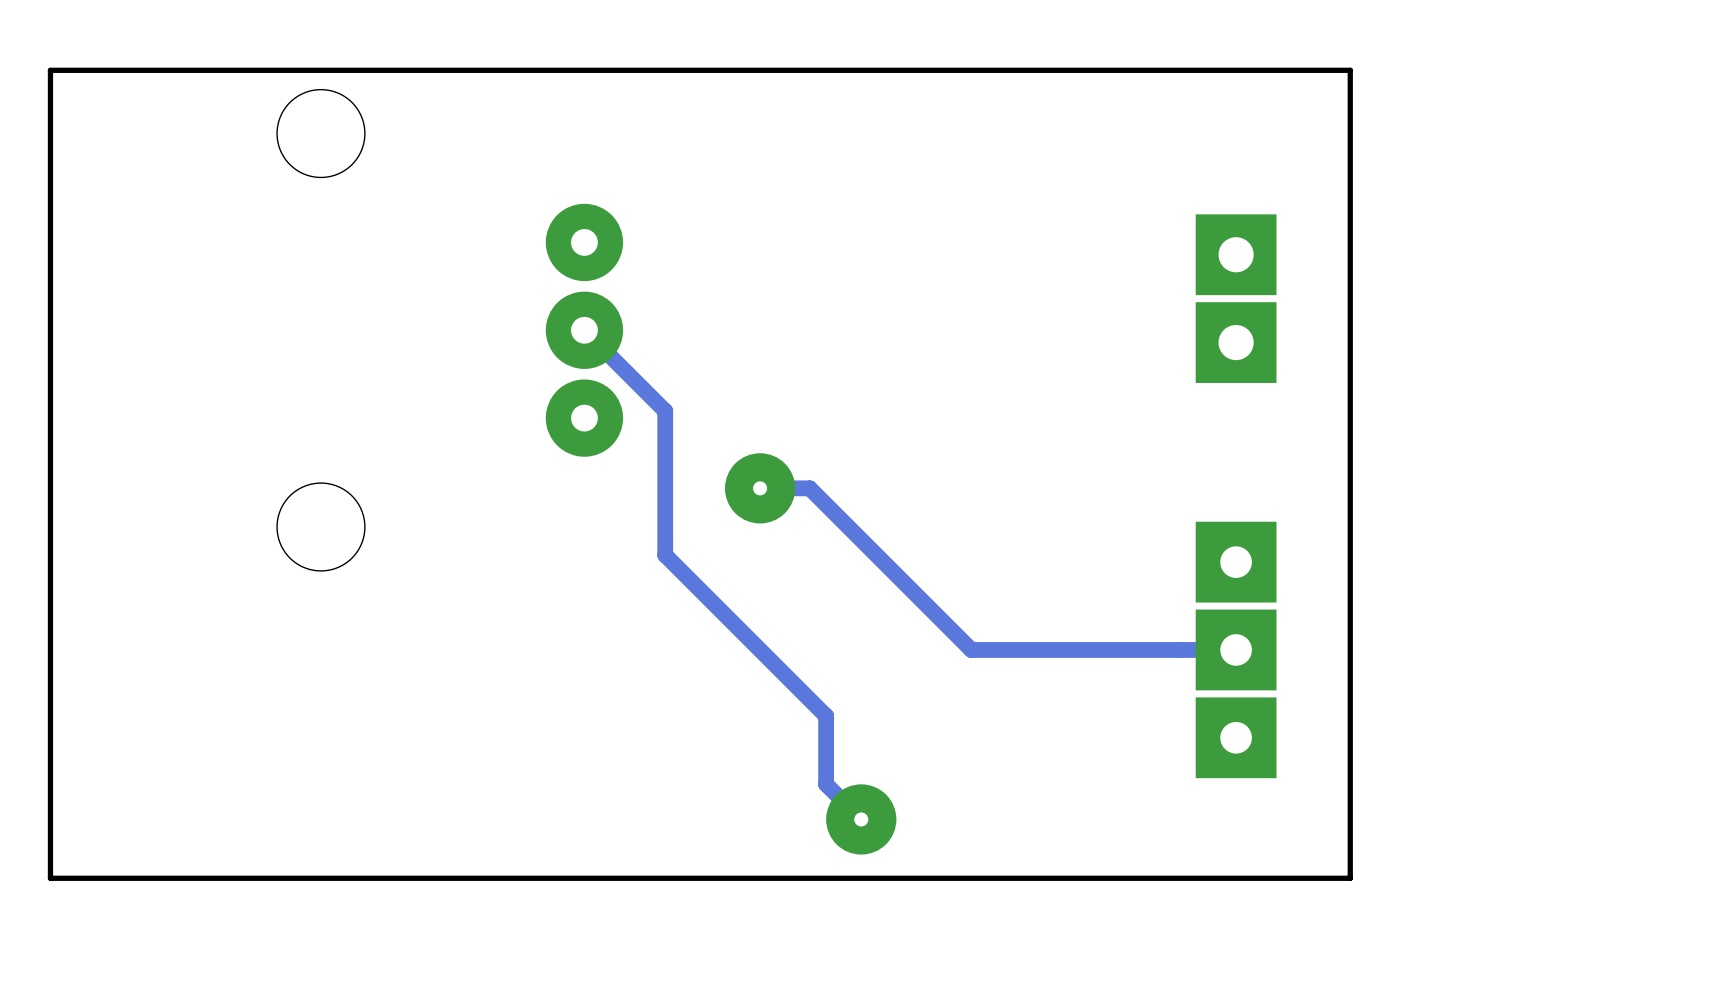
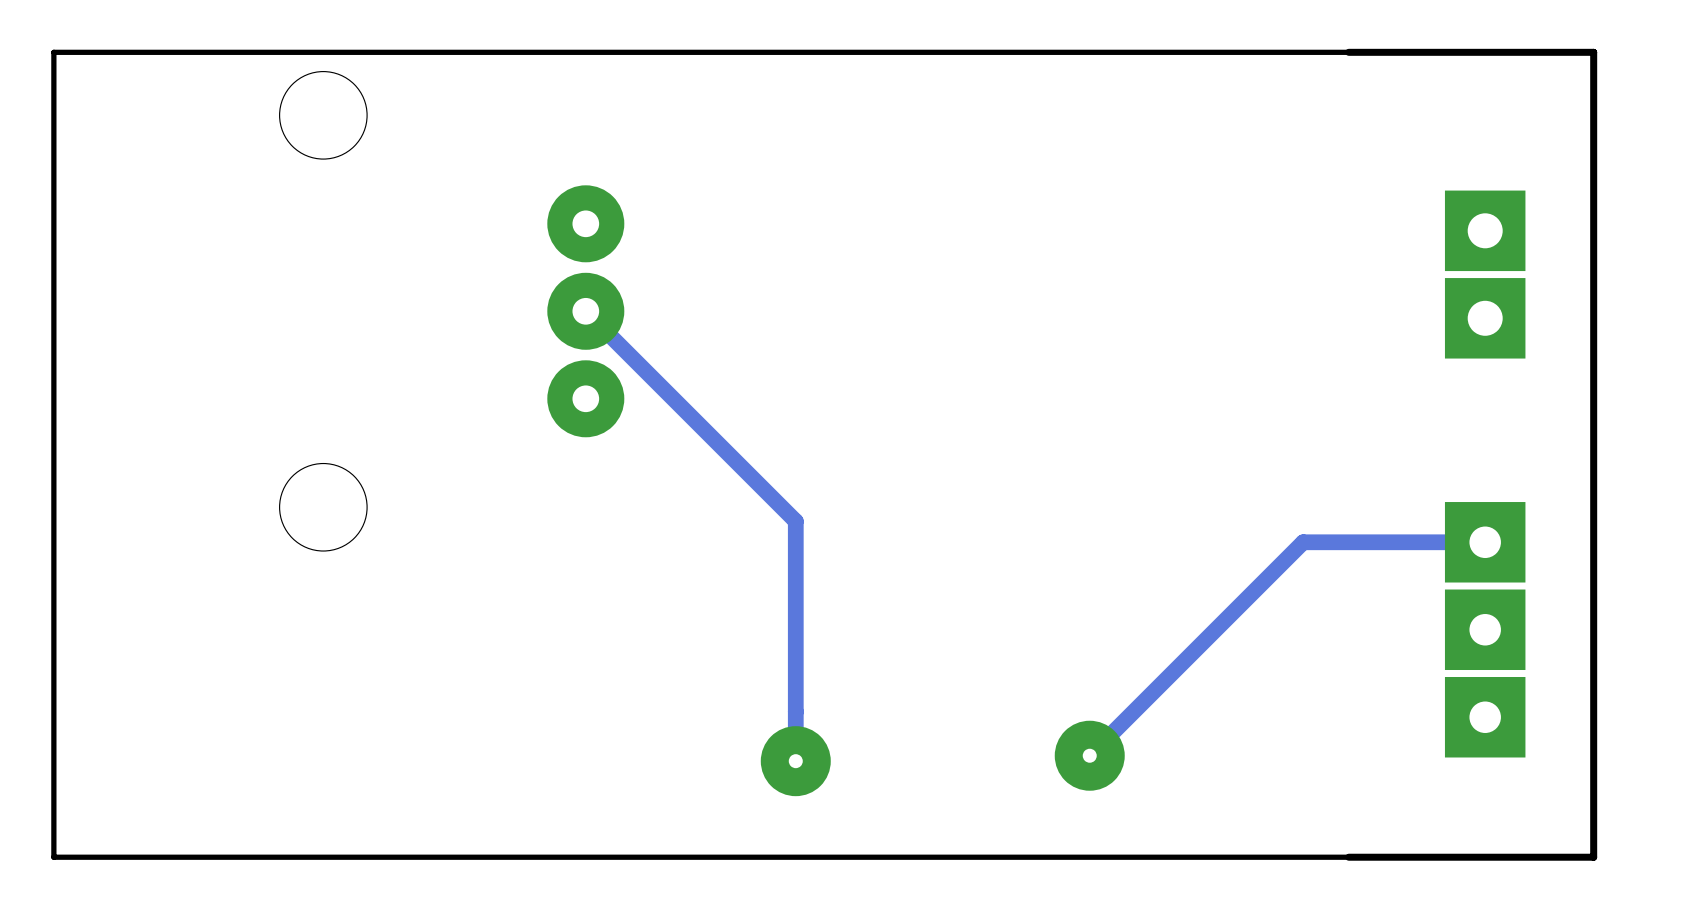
board edge: (1350, 70) (1350, 878) -> (1348, 52) (1593, 52) (1593, 857) (1348, 857)
part position: (1236, 298) -> (1485, 274)
track: (665, 411) (665, 555) (826, 716) (826, 784) (861, 819) -> (666, 391) (795, 521) (795, 761)
track: (760, 488) (809, 488) (971, 649) (1236, 649) -> none
via: (760, 488) -> none
track: none -> (1485, 542) (1303, 542) (1089, 755)
part position: (1236, 649) -> (1485, 629)
via: none -> (1089, 755)
via position: (861, 819) -> (795, 761)

